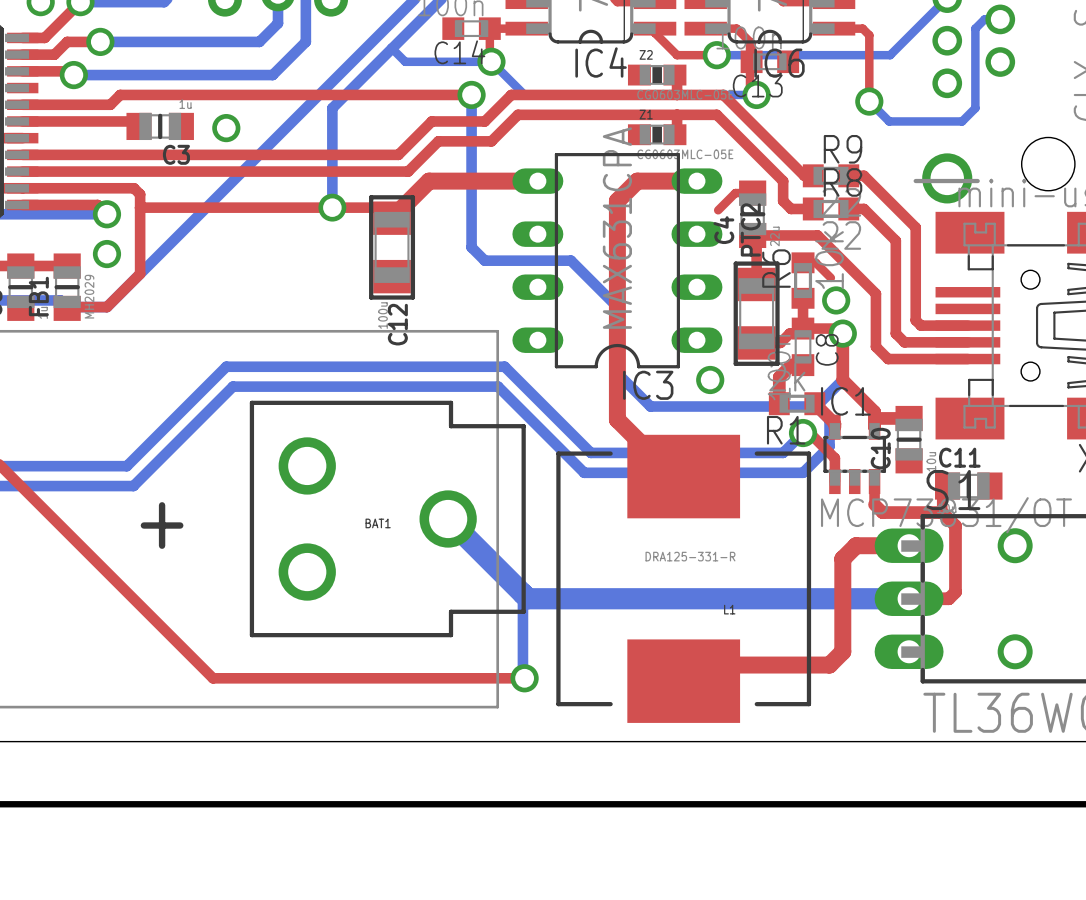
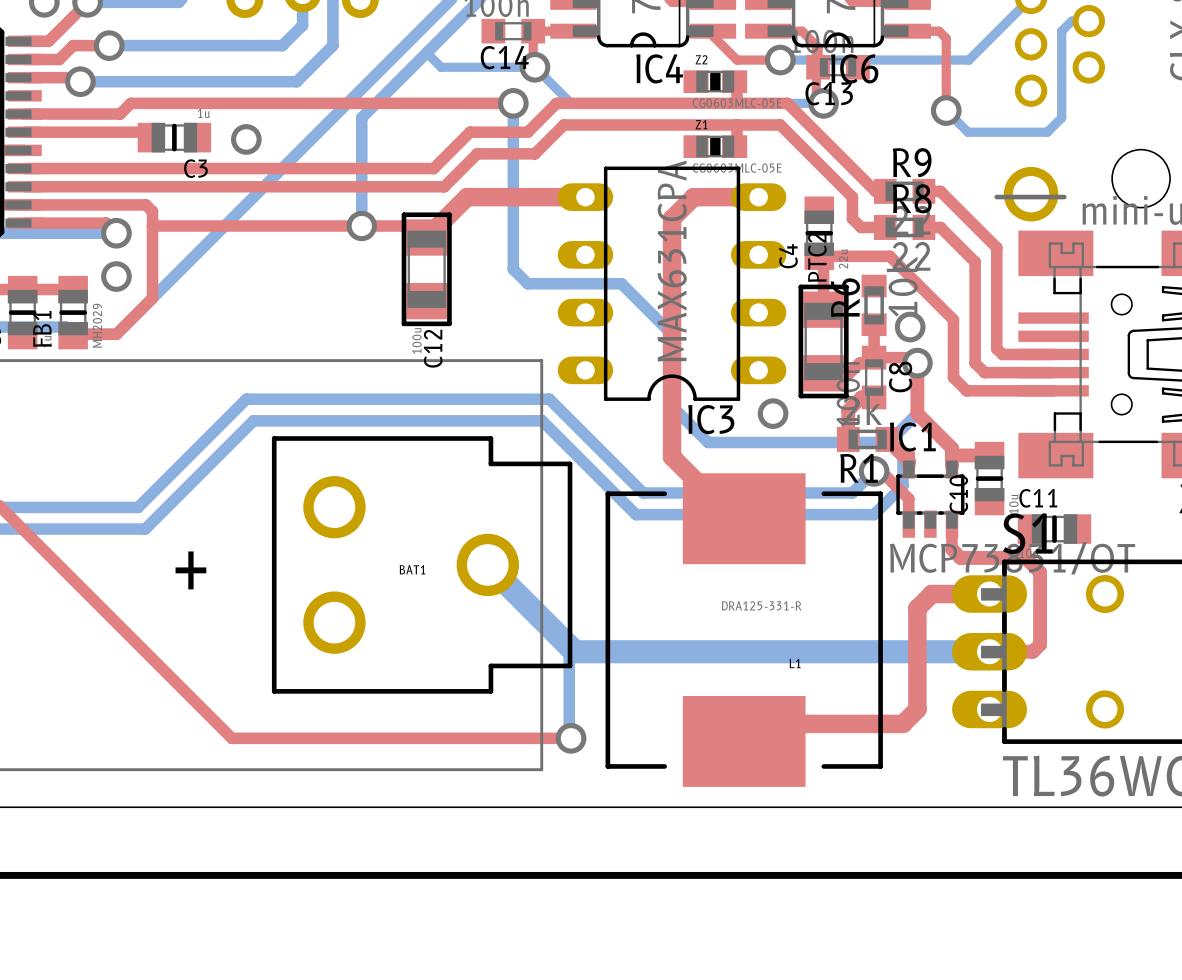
top track: (752, 193) (735, 193) (718, 210) -> none
top track: (803, 262) (815, 262) (830, 277) -> none

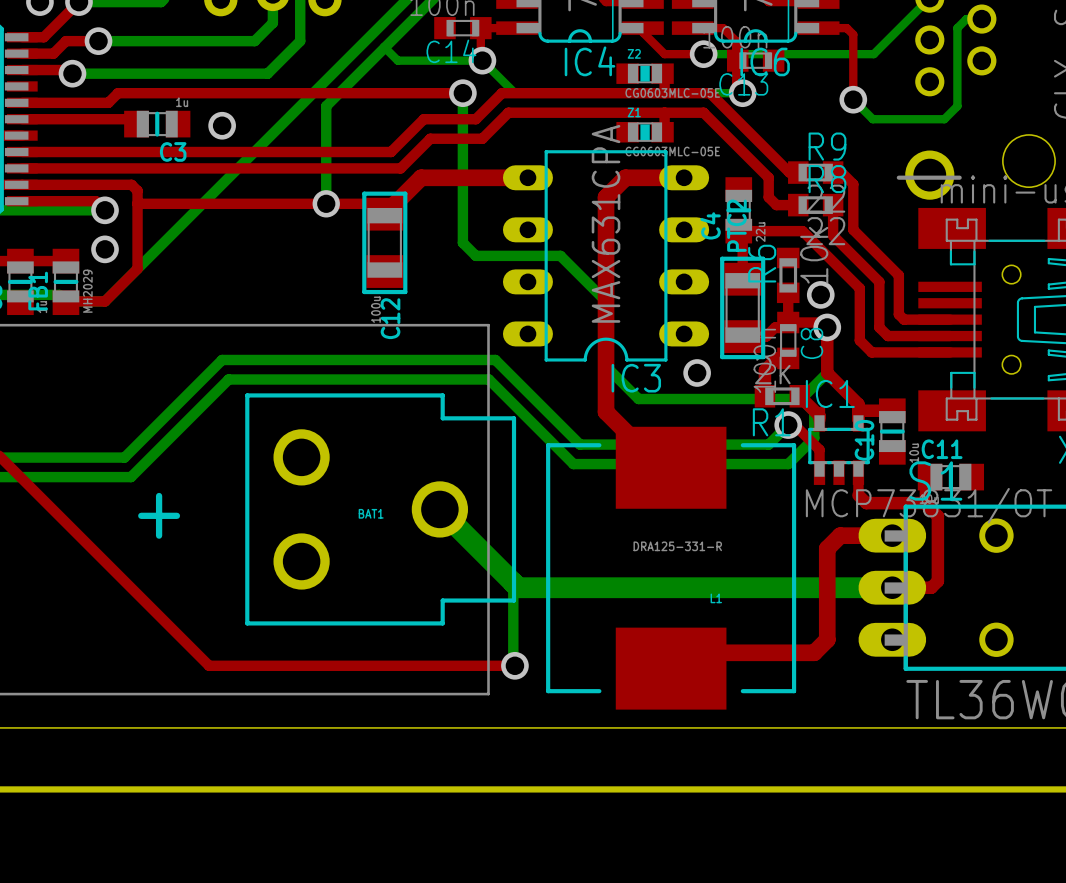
top track: (933, 191) (940, 191) (996, 247) (996, 305) -> (841, 172) (853, 184) (853, 229) (898, 275)
top track: (923, 227) (940, 227) (975, 262) (975, 312) -> (833, 205) (833, 235) (879, 281)

